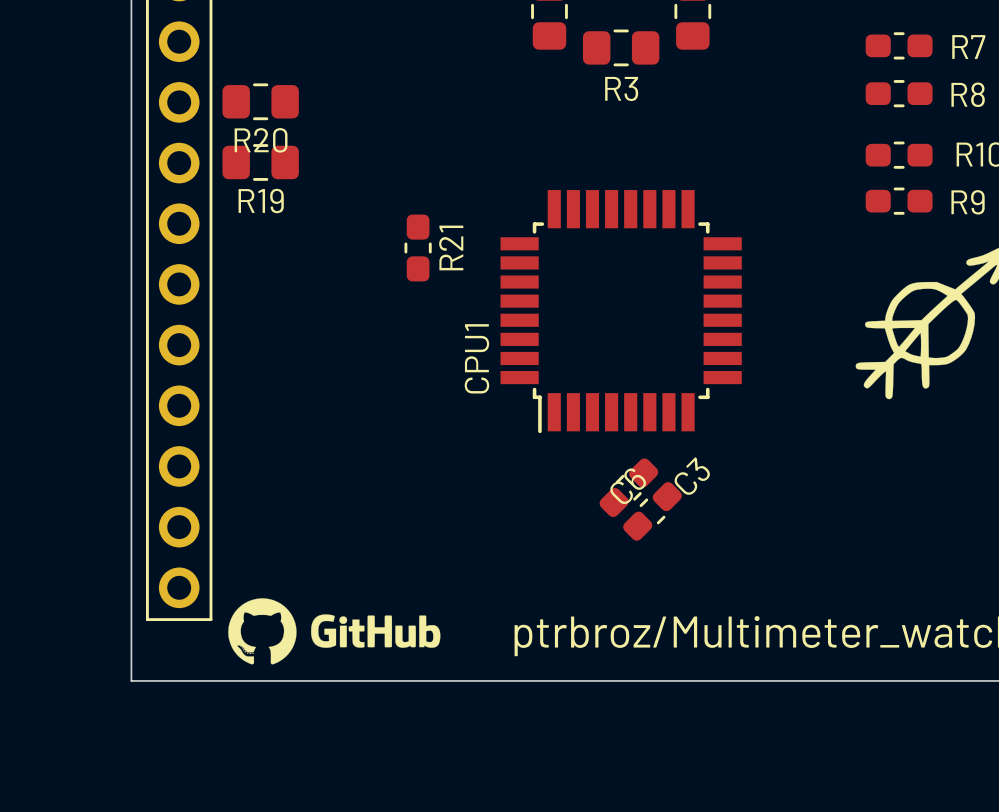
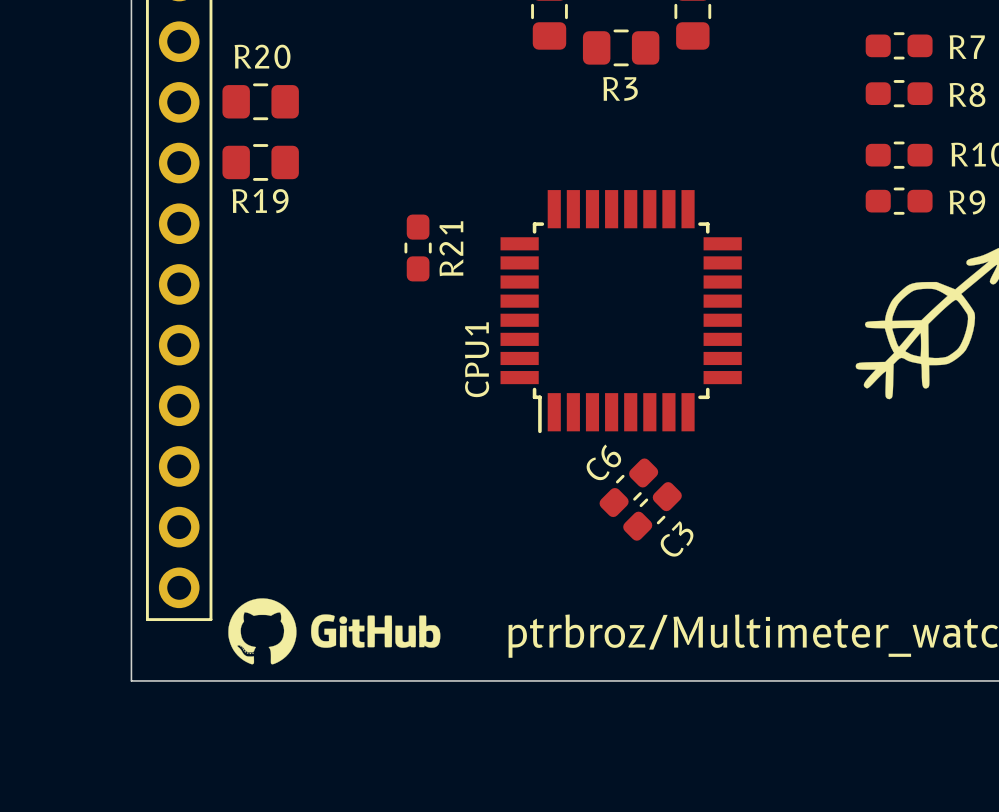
R20 name position: R20 (261, 140) -> R20 (262, 56)
C3 name position: C3 (692, 476) -> C3 (676, 538)
C6 name position: C6 (628, 486) -> C6 (603, 462)

